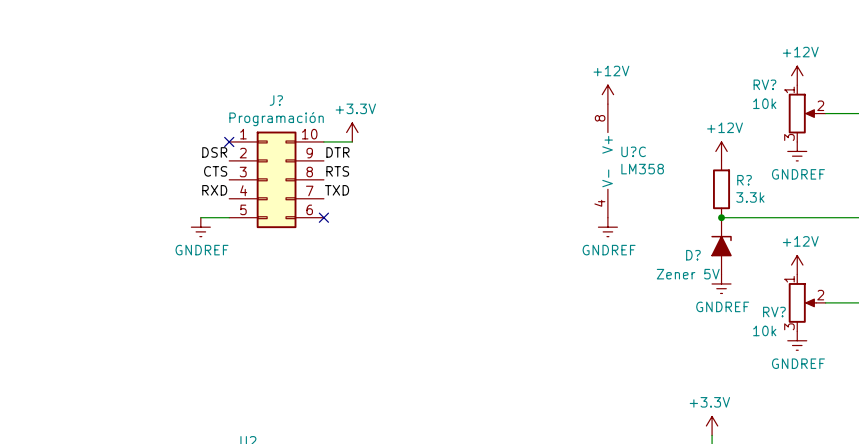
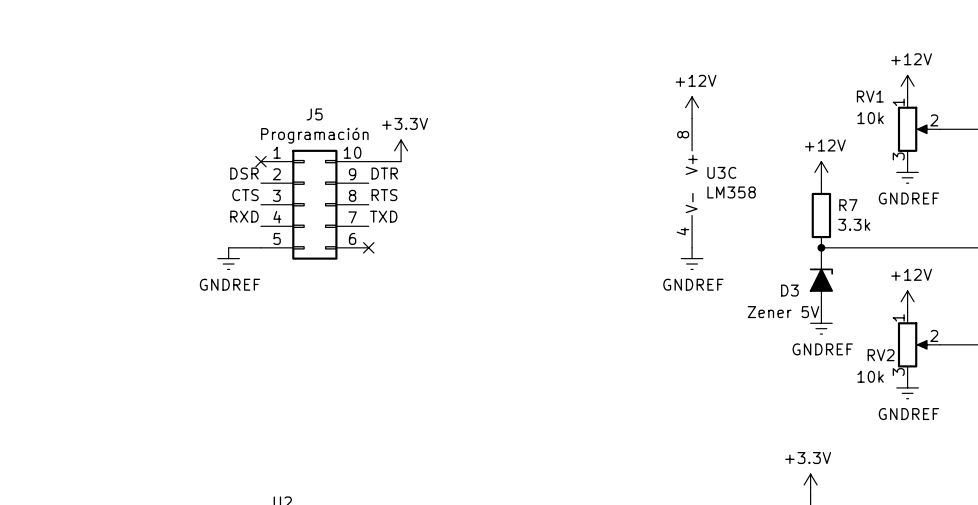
RV? name: RV? (764, 84) -> RV1 (870, 96)
J? name: J? (276, 100) -> J5 (314, 114)
U?C name: U?C (633, 151) -> U3C (721, 172)
R? name: R? (744, 180) -> R7 (848, 205)
D? name: D? (693, 255) -> D3 (789, 290)
RV? name: RV? (774, 312) -> RV2 (881, 355)

